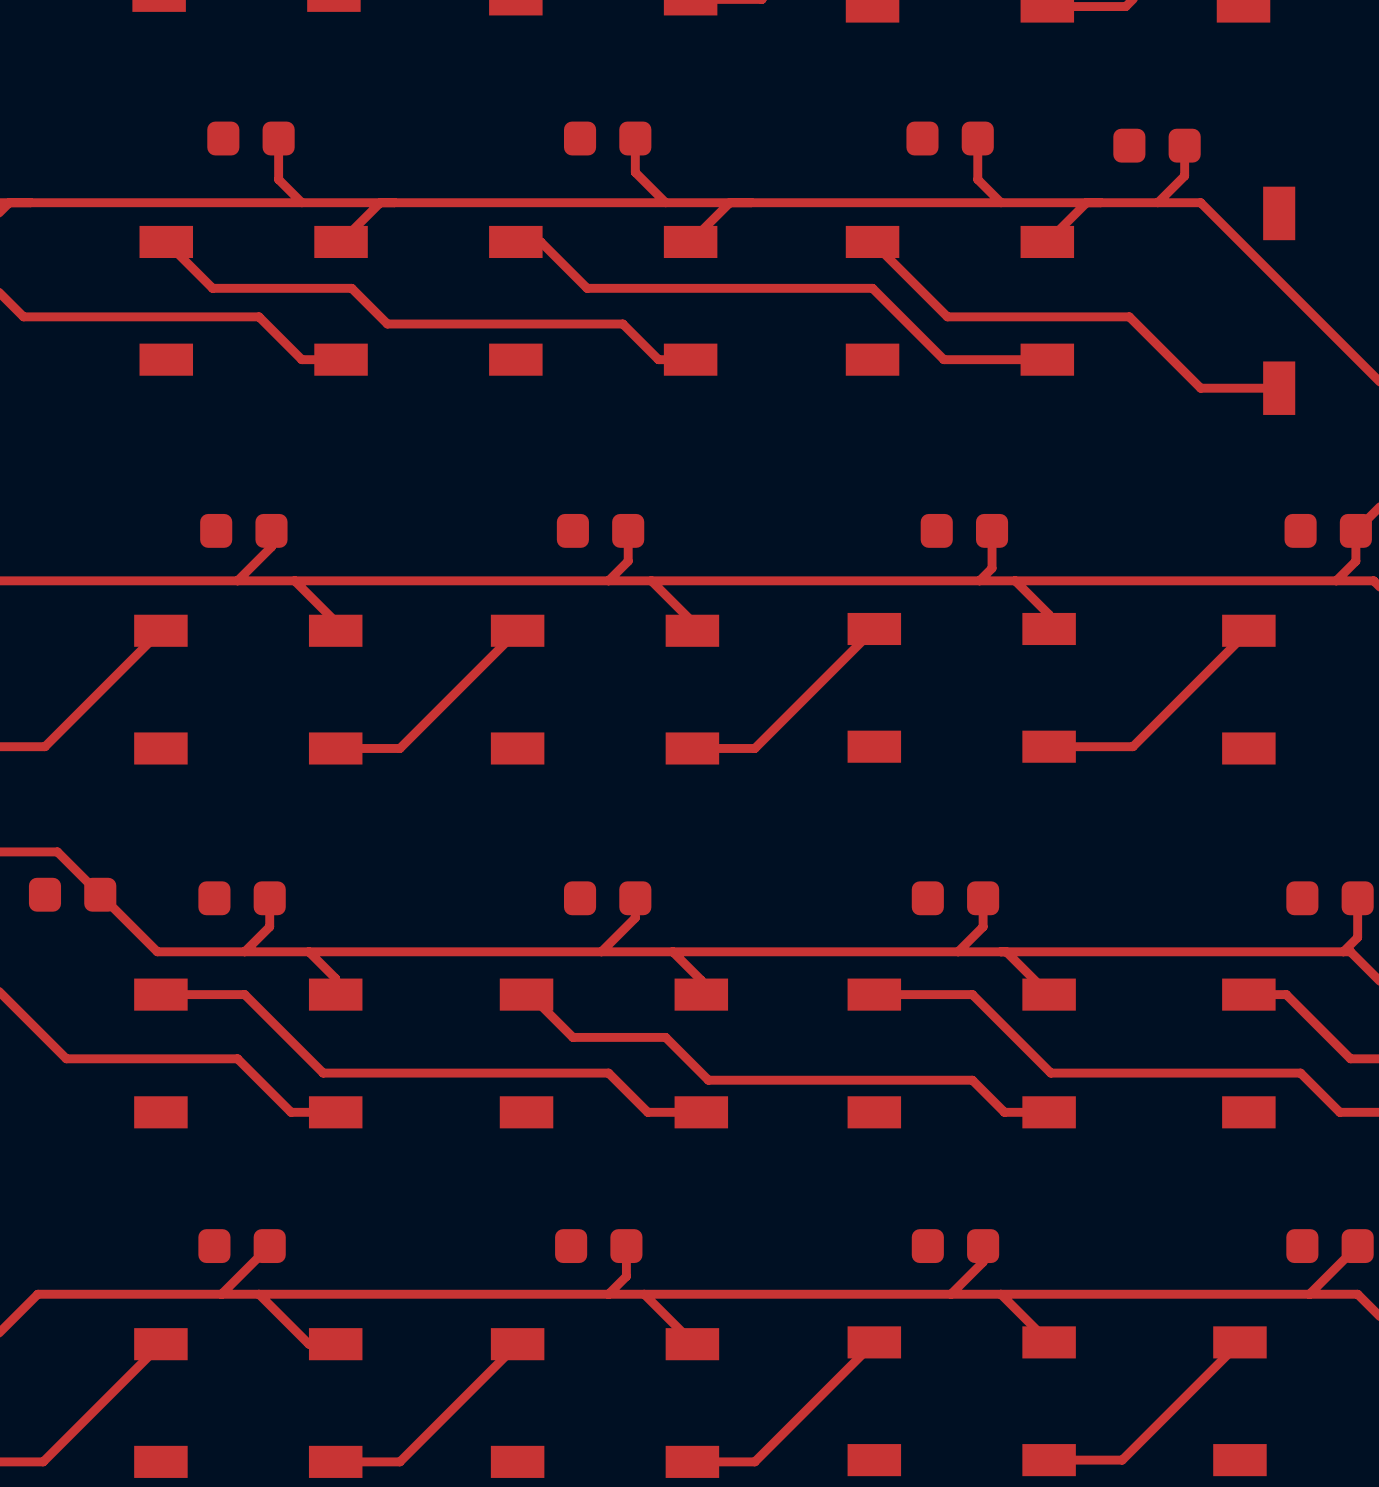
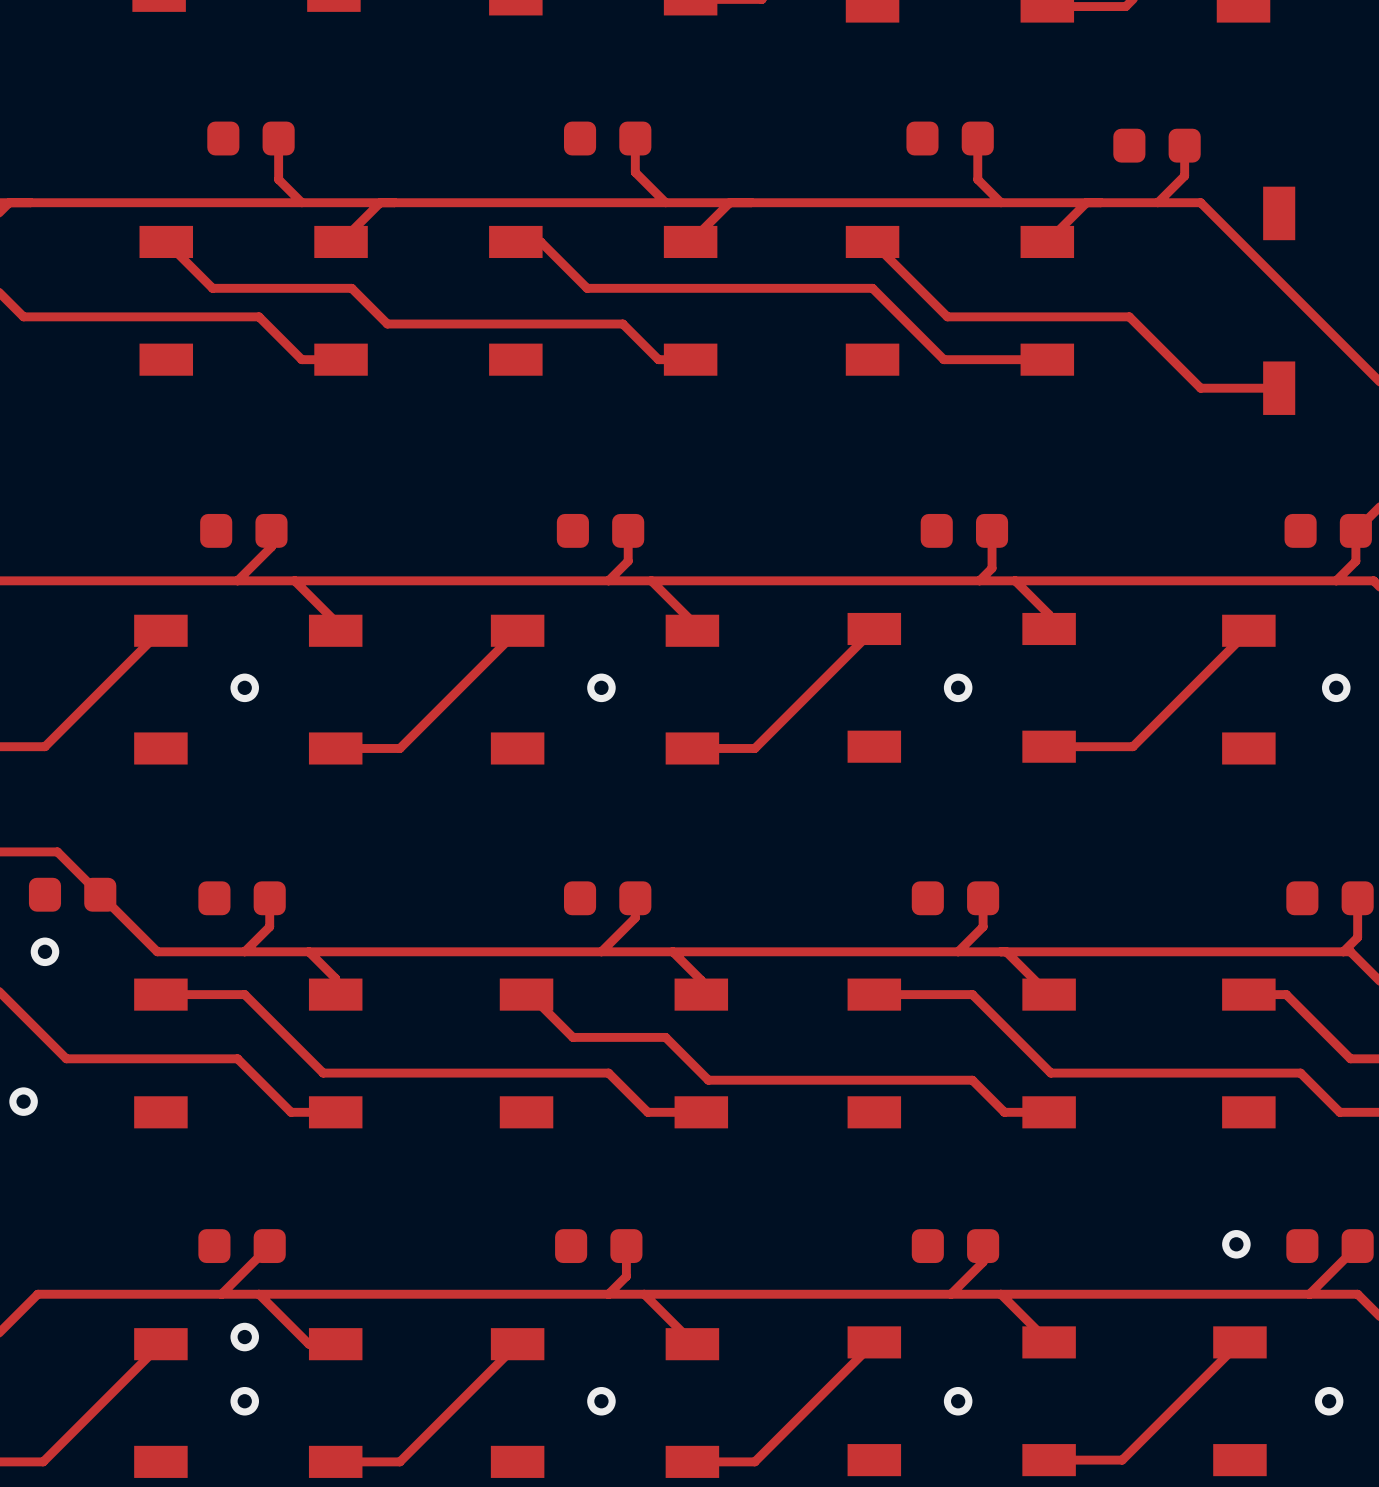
via: none -> (244, 687)
via: none -> (601, 687)
via: none -> (958, 687)
via: none -> (1336, 687)
via: none -> (44, 951)
via: none -> (23, 1101)
via: none -> (1236, 1244)
via: none -> (244, 1337)
via: none -> (244, 1401)
via: none -> (601, 1401)
via: none -> (958, 1401)
via: none -> (1329, 1401)

